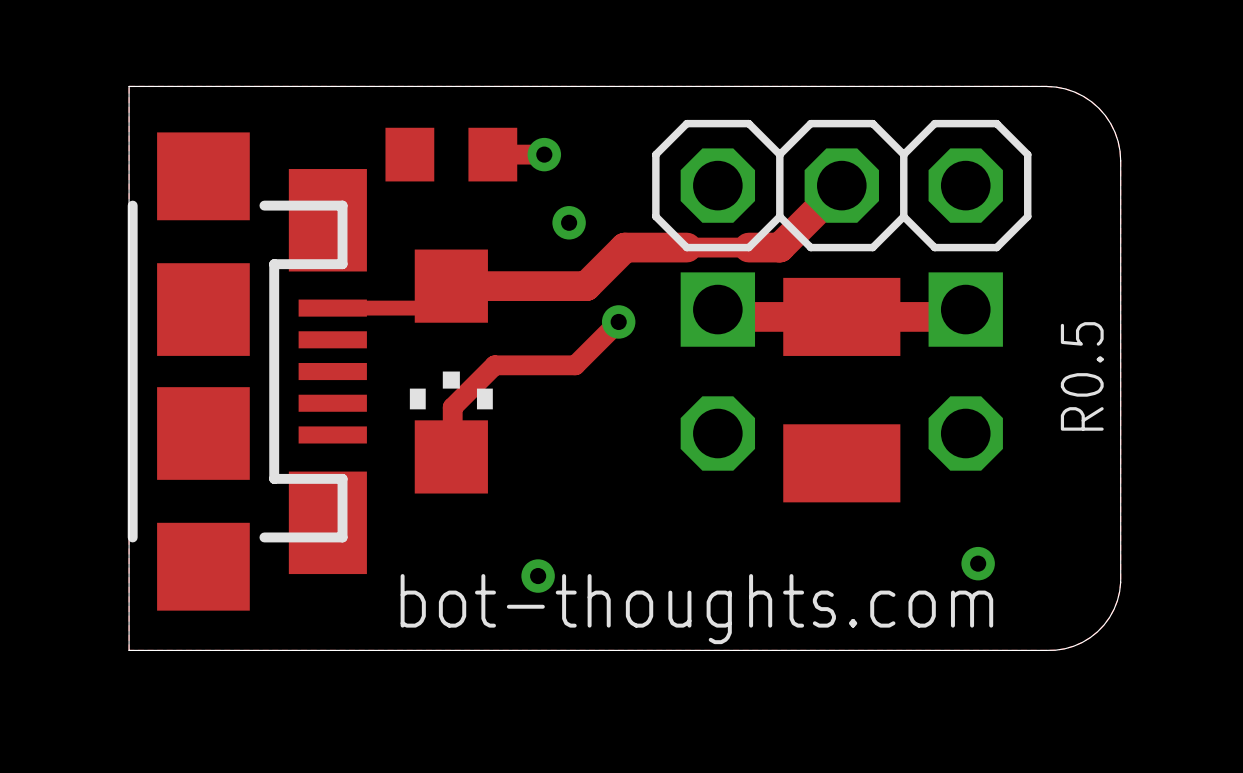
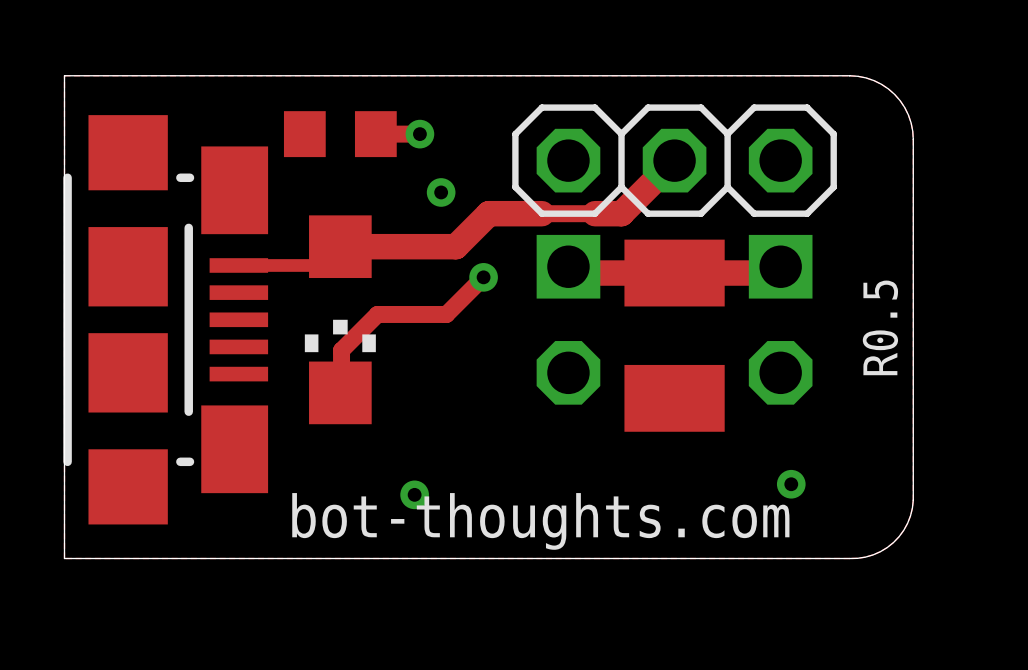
part footprint: [127, 132, 367, 611] -> [63, 115, 269, 525]

